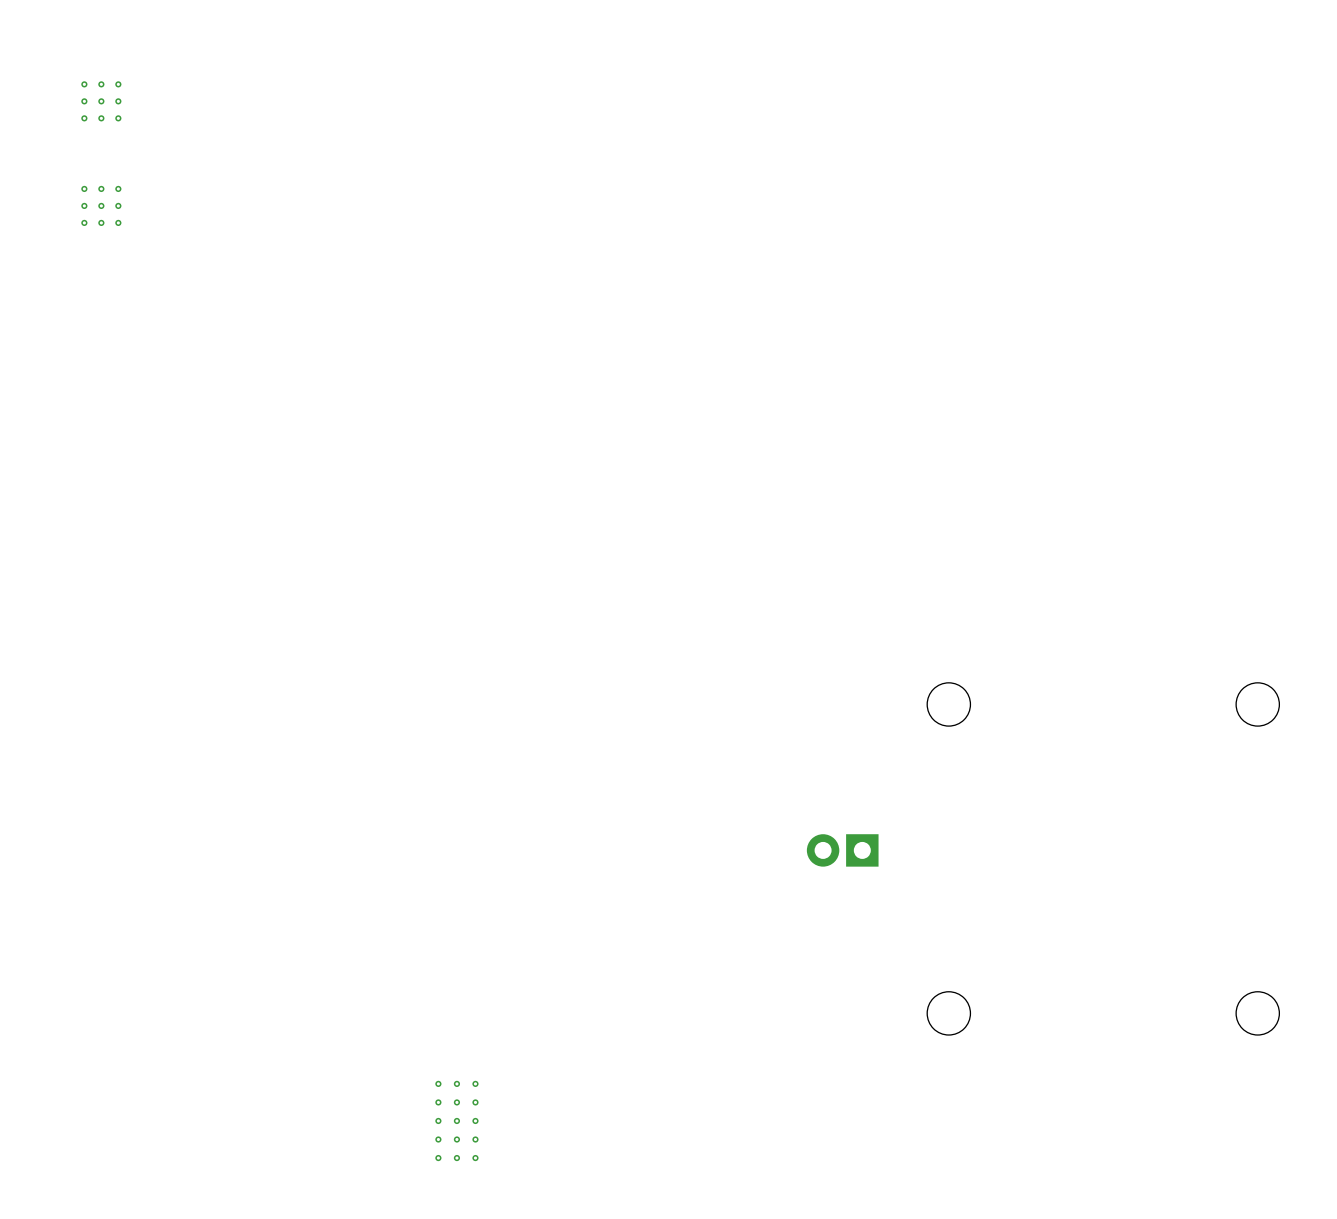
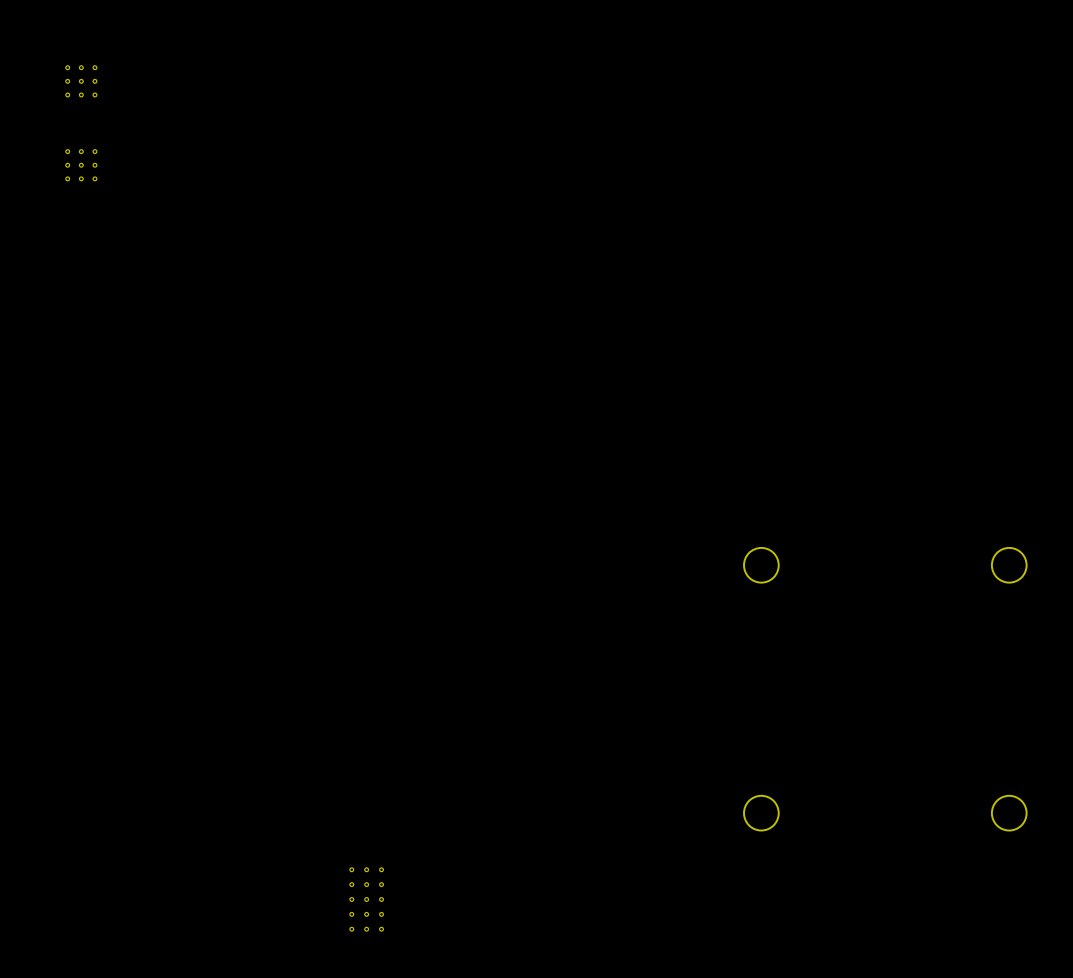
part: (842, 850) -> none

